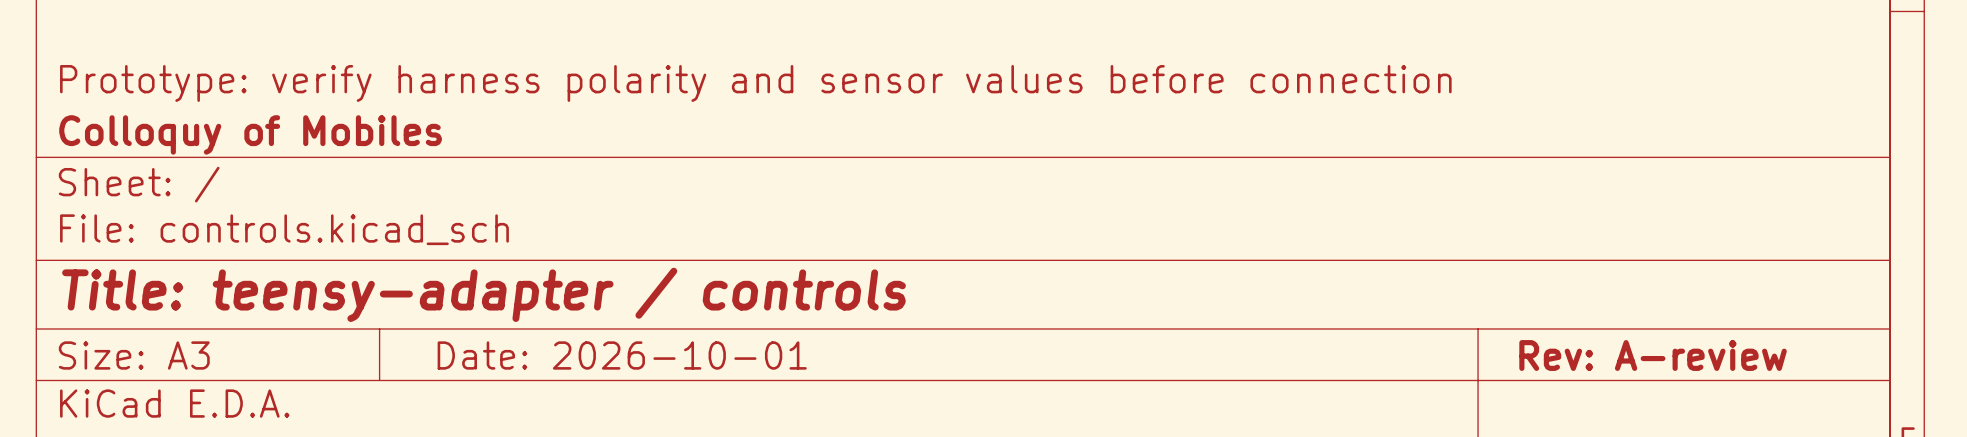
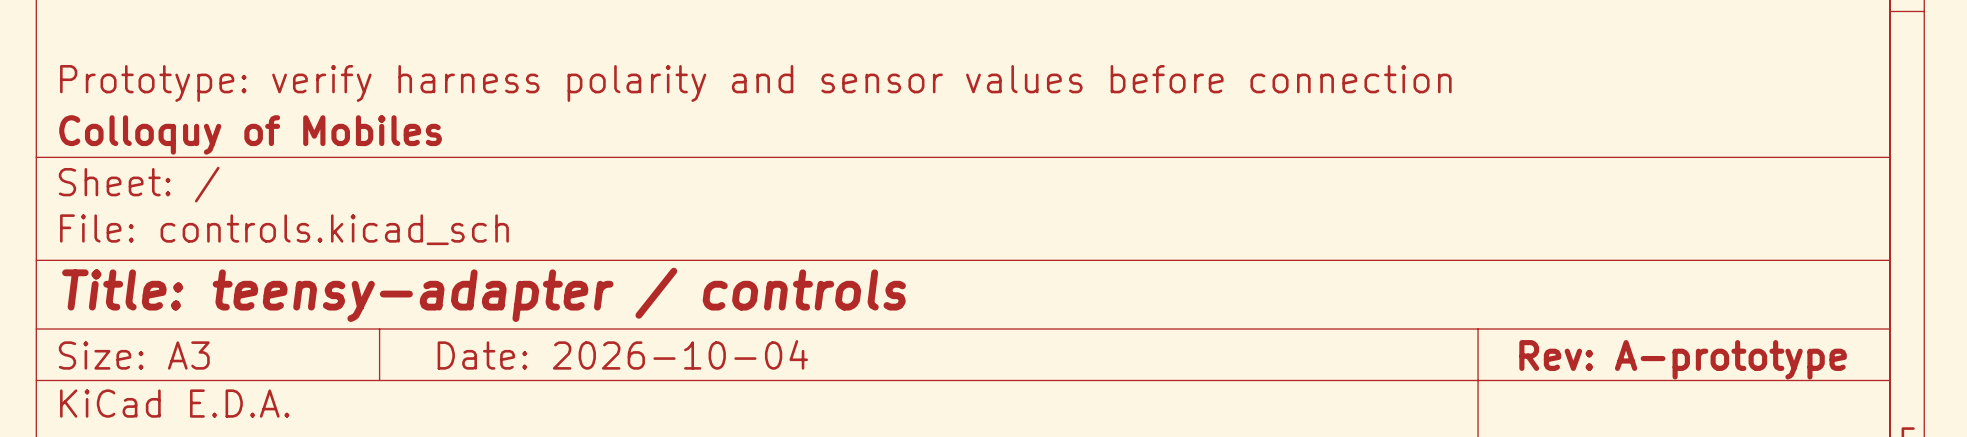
title block: Date: 2026-10-01 (622, 355) -> Date: 2026-10-04 (622, 354)
title block: Rev: A-review (1653, 355) -> Rev: A-prototype (1683, 359)

